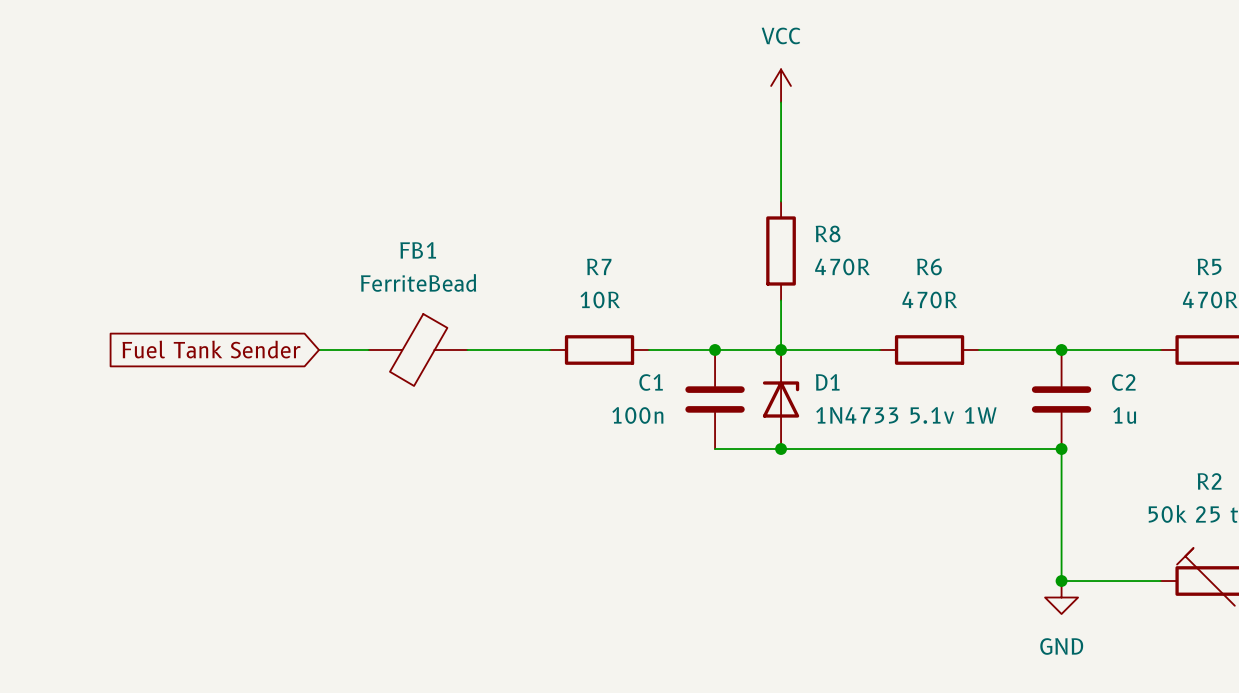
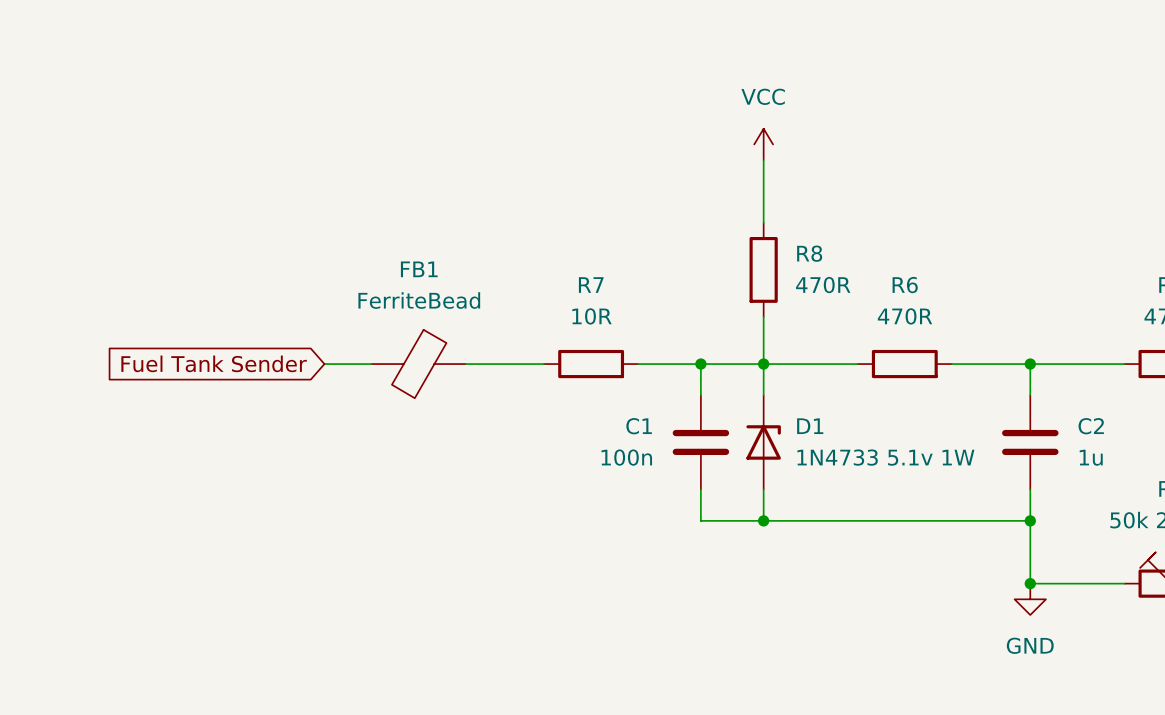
power symbol position: VCC (781, 85) -> VCC (763, 144)
C1 position: (715, 399) -> (700, 442)
D1 position: (781, 399) -> (763, 442)
C2 position: (1061, 399) -> (1030, 442)
wire: (715, 449) (1061, 449) (1061, 482) -> none
junction position: (781, 449) -> (763, 520)
junction position: (1061, 449) -> (1030, 520)
wire: none -> (700, 489) (700, 520) (1030, 520)
wire: none -> (763, 489) (763, 520)

